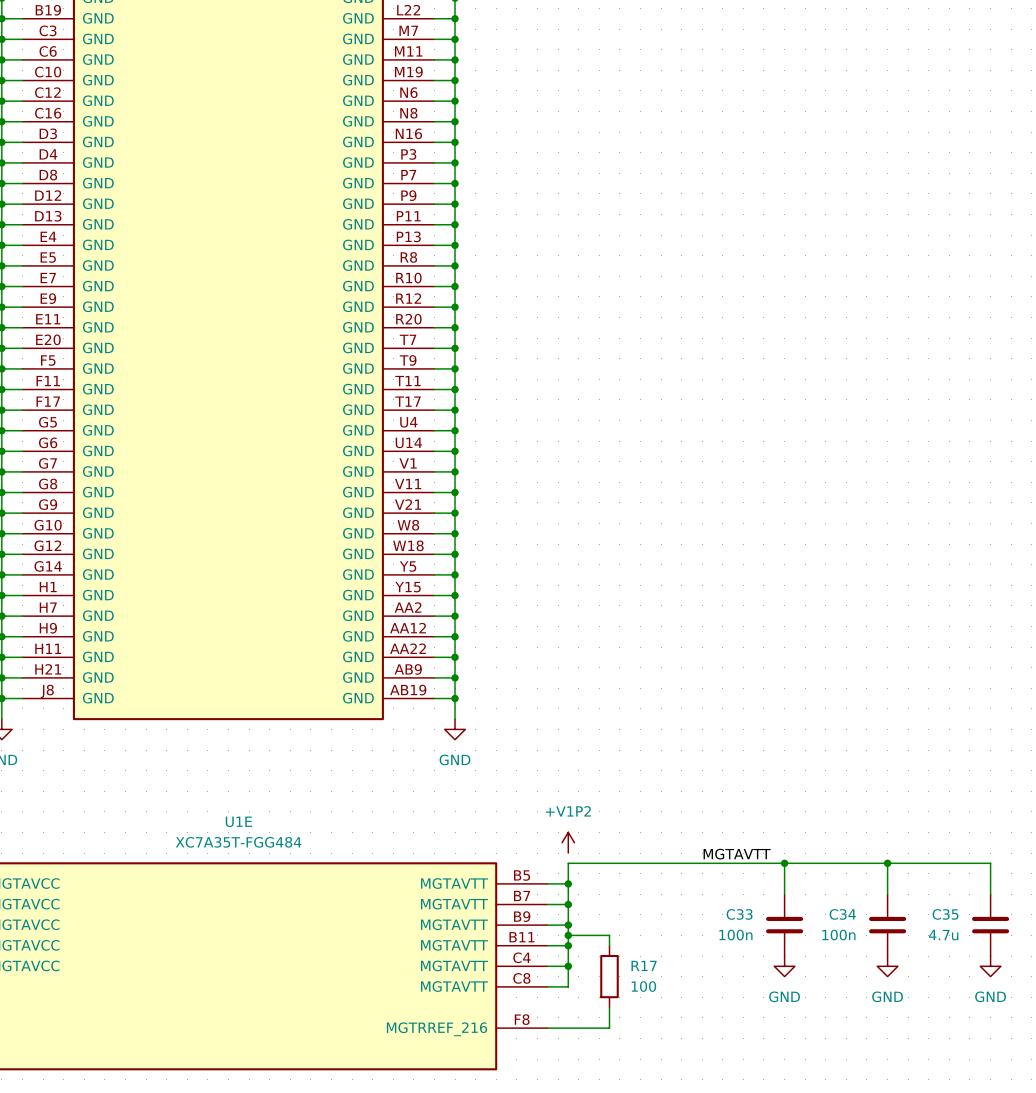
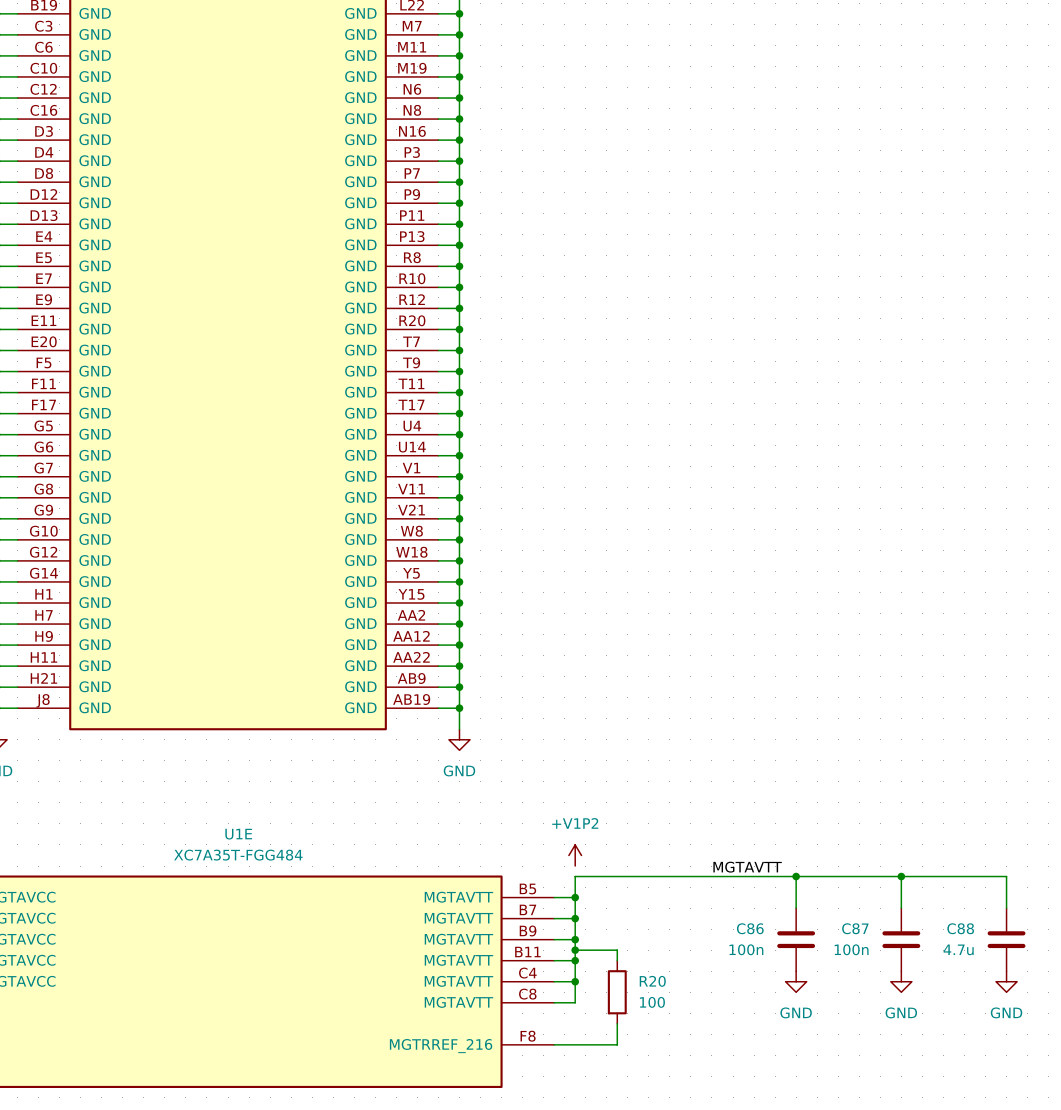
C33 name: C33 (739, 914) -> C86 (750, 928)
C34 name: C34 (842, 914) -> C87 (855, 928)
C35 name: C35 (945, 914) -> C88 (960, 928)
R17 name: R17 (644, 965) -> R20 (652, 981)

